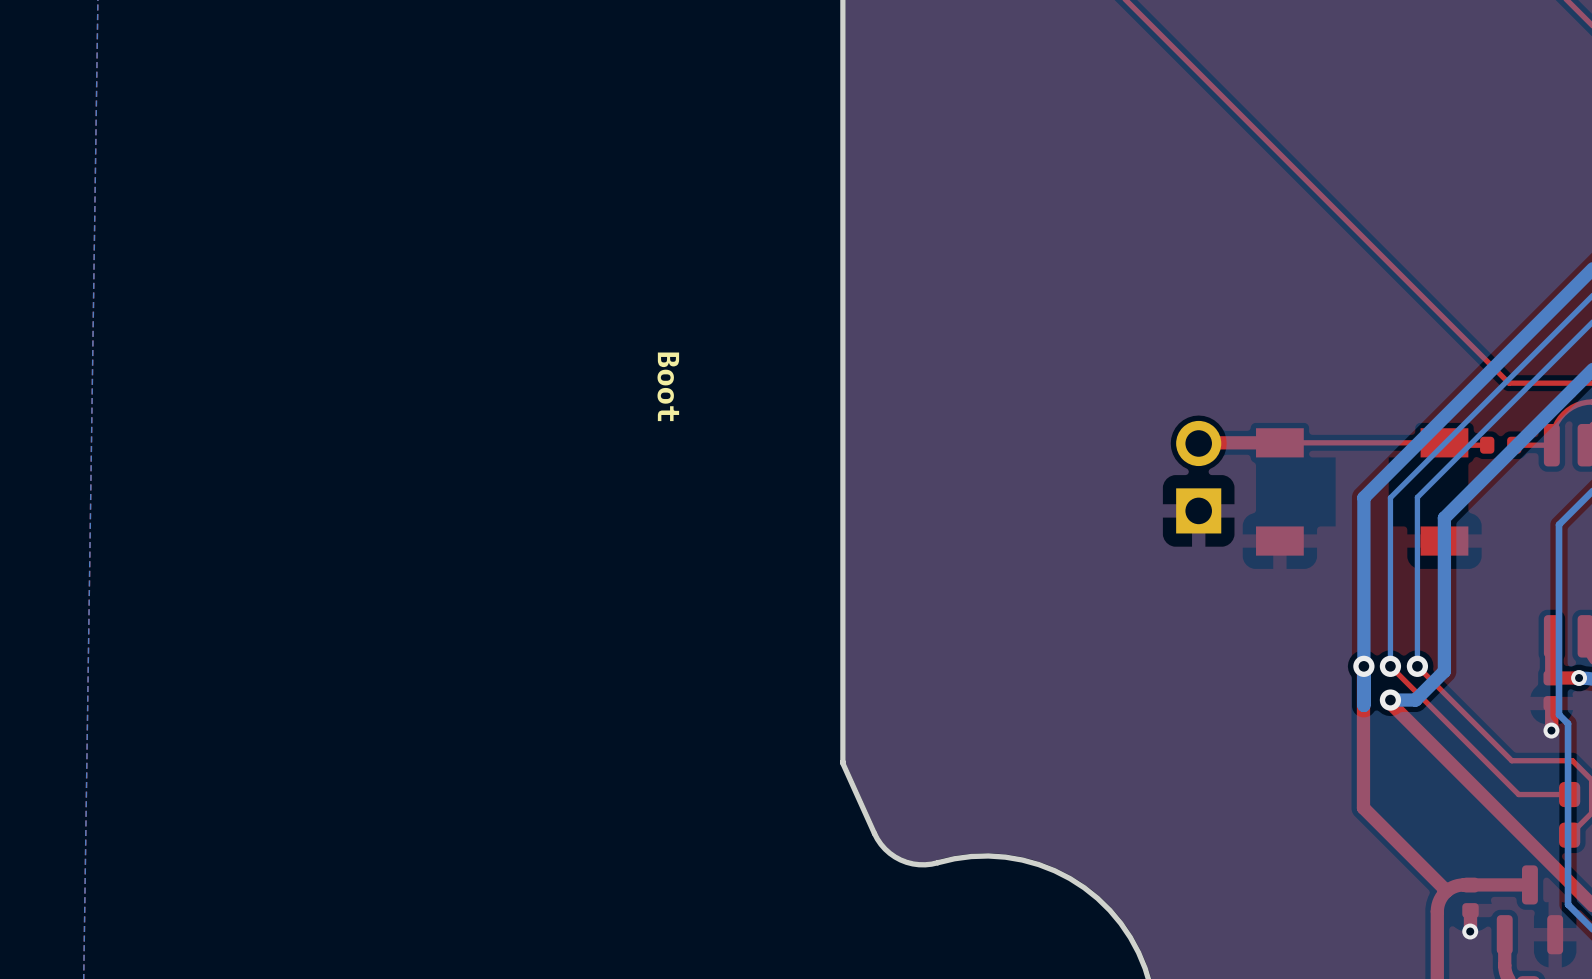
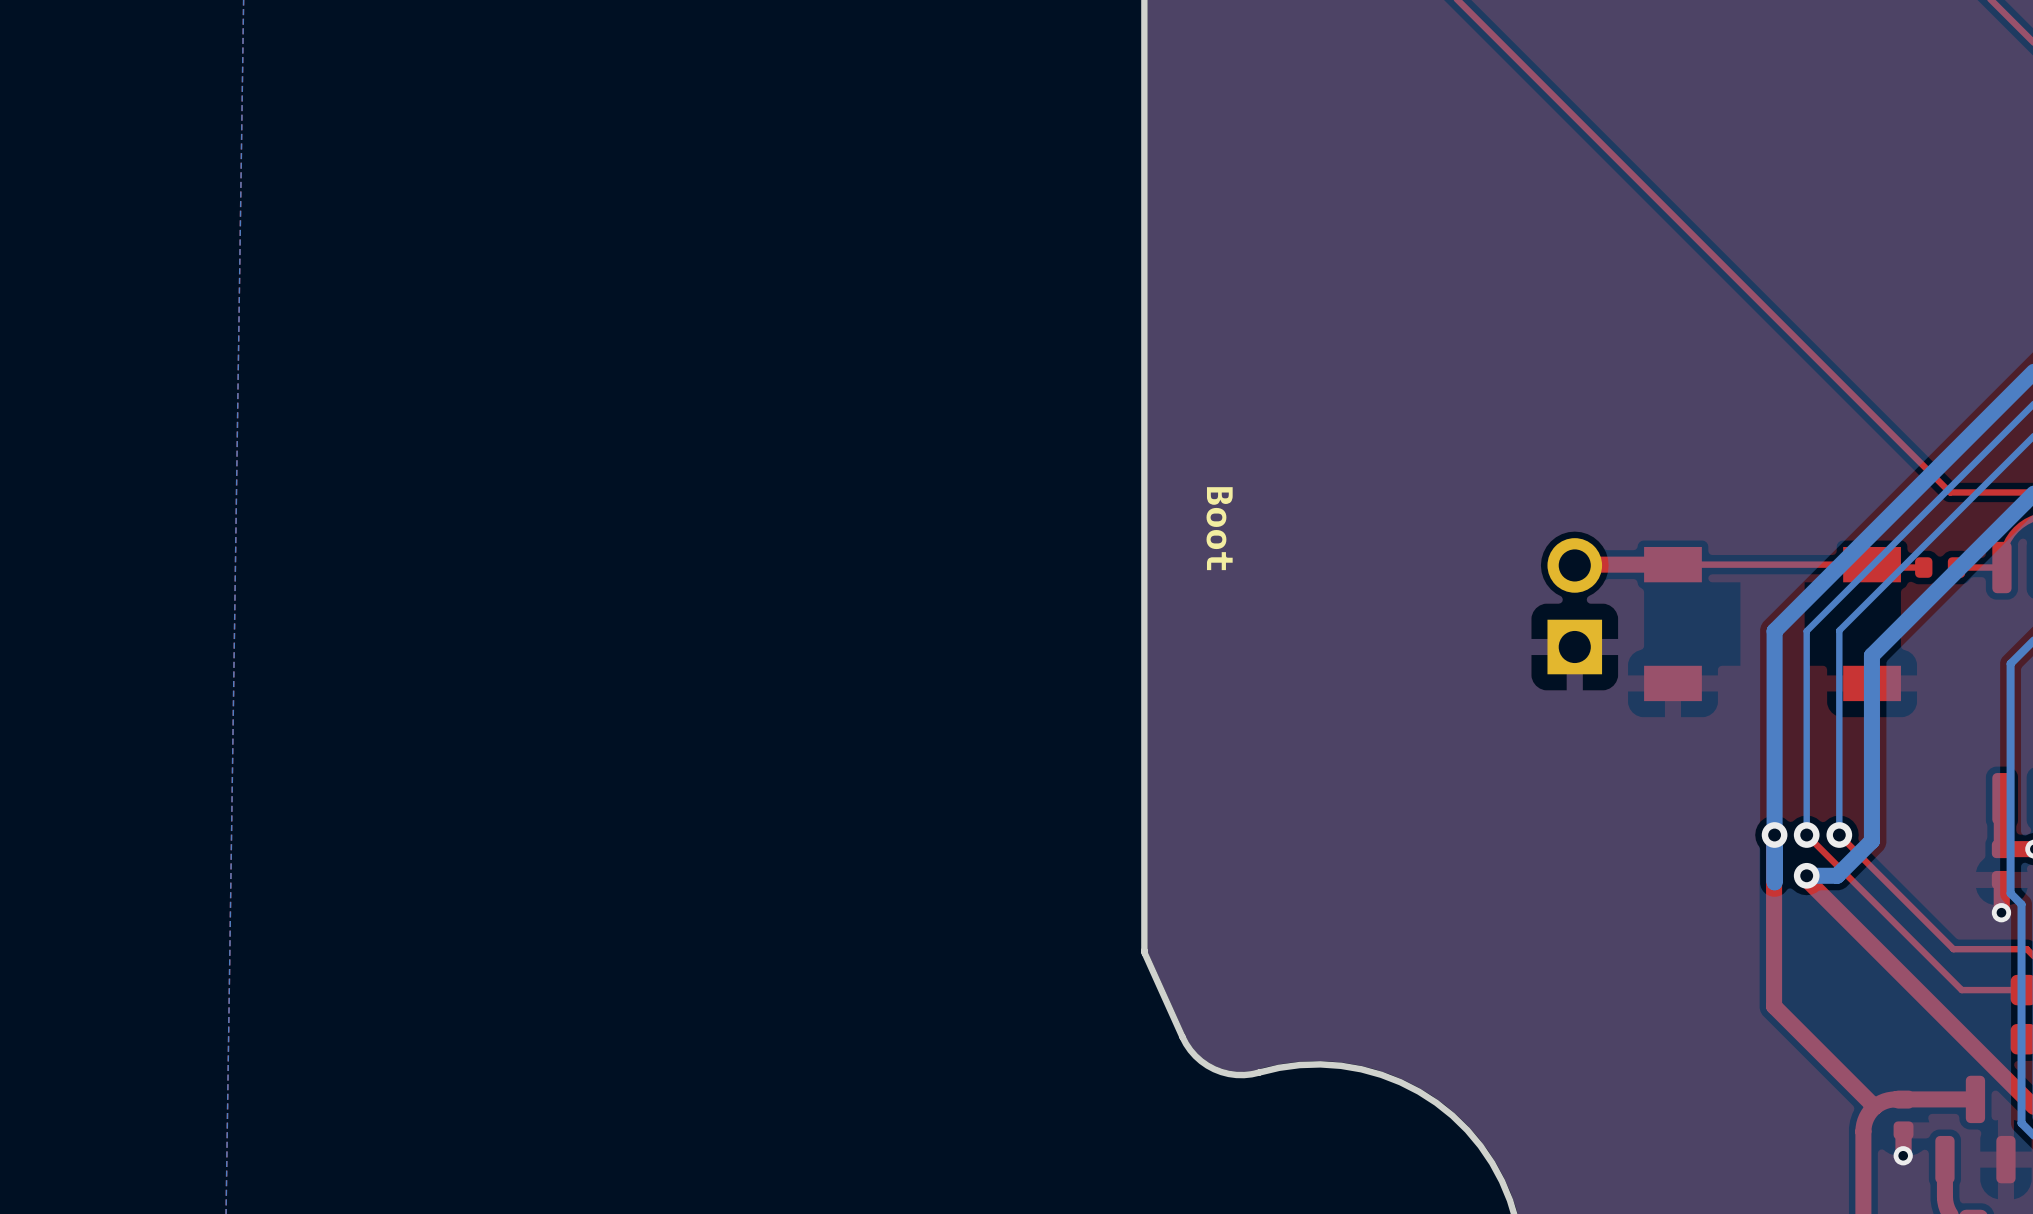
text position: Boot (668, 386) -> Boot (1219, 528)

